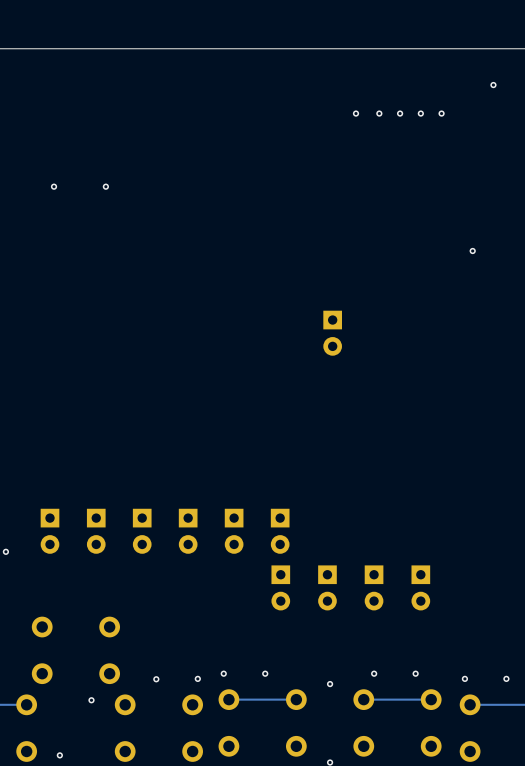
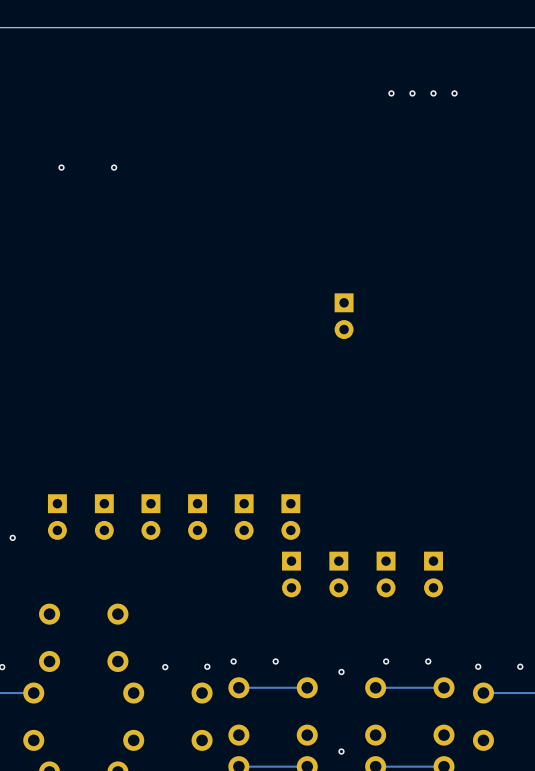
via: (493, 85) -> none
via: (356, 113) -> none
via: (472, 251) -> none
via: (91, 700) -> none
via: (59, 755) -> none

